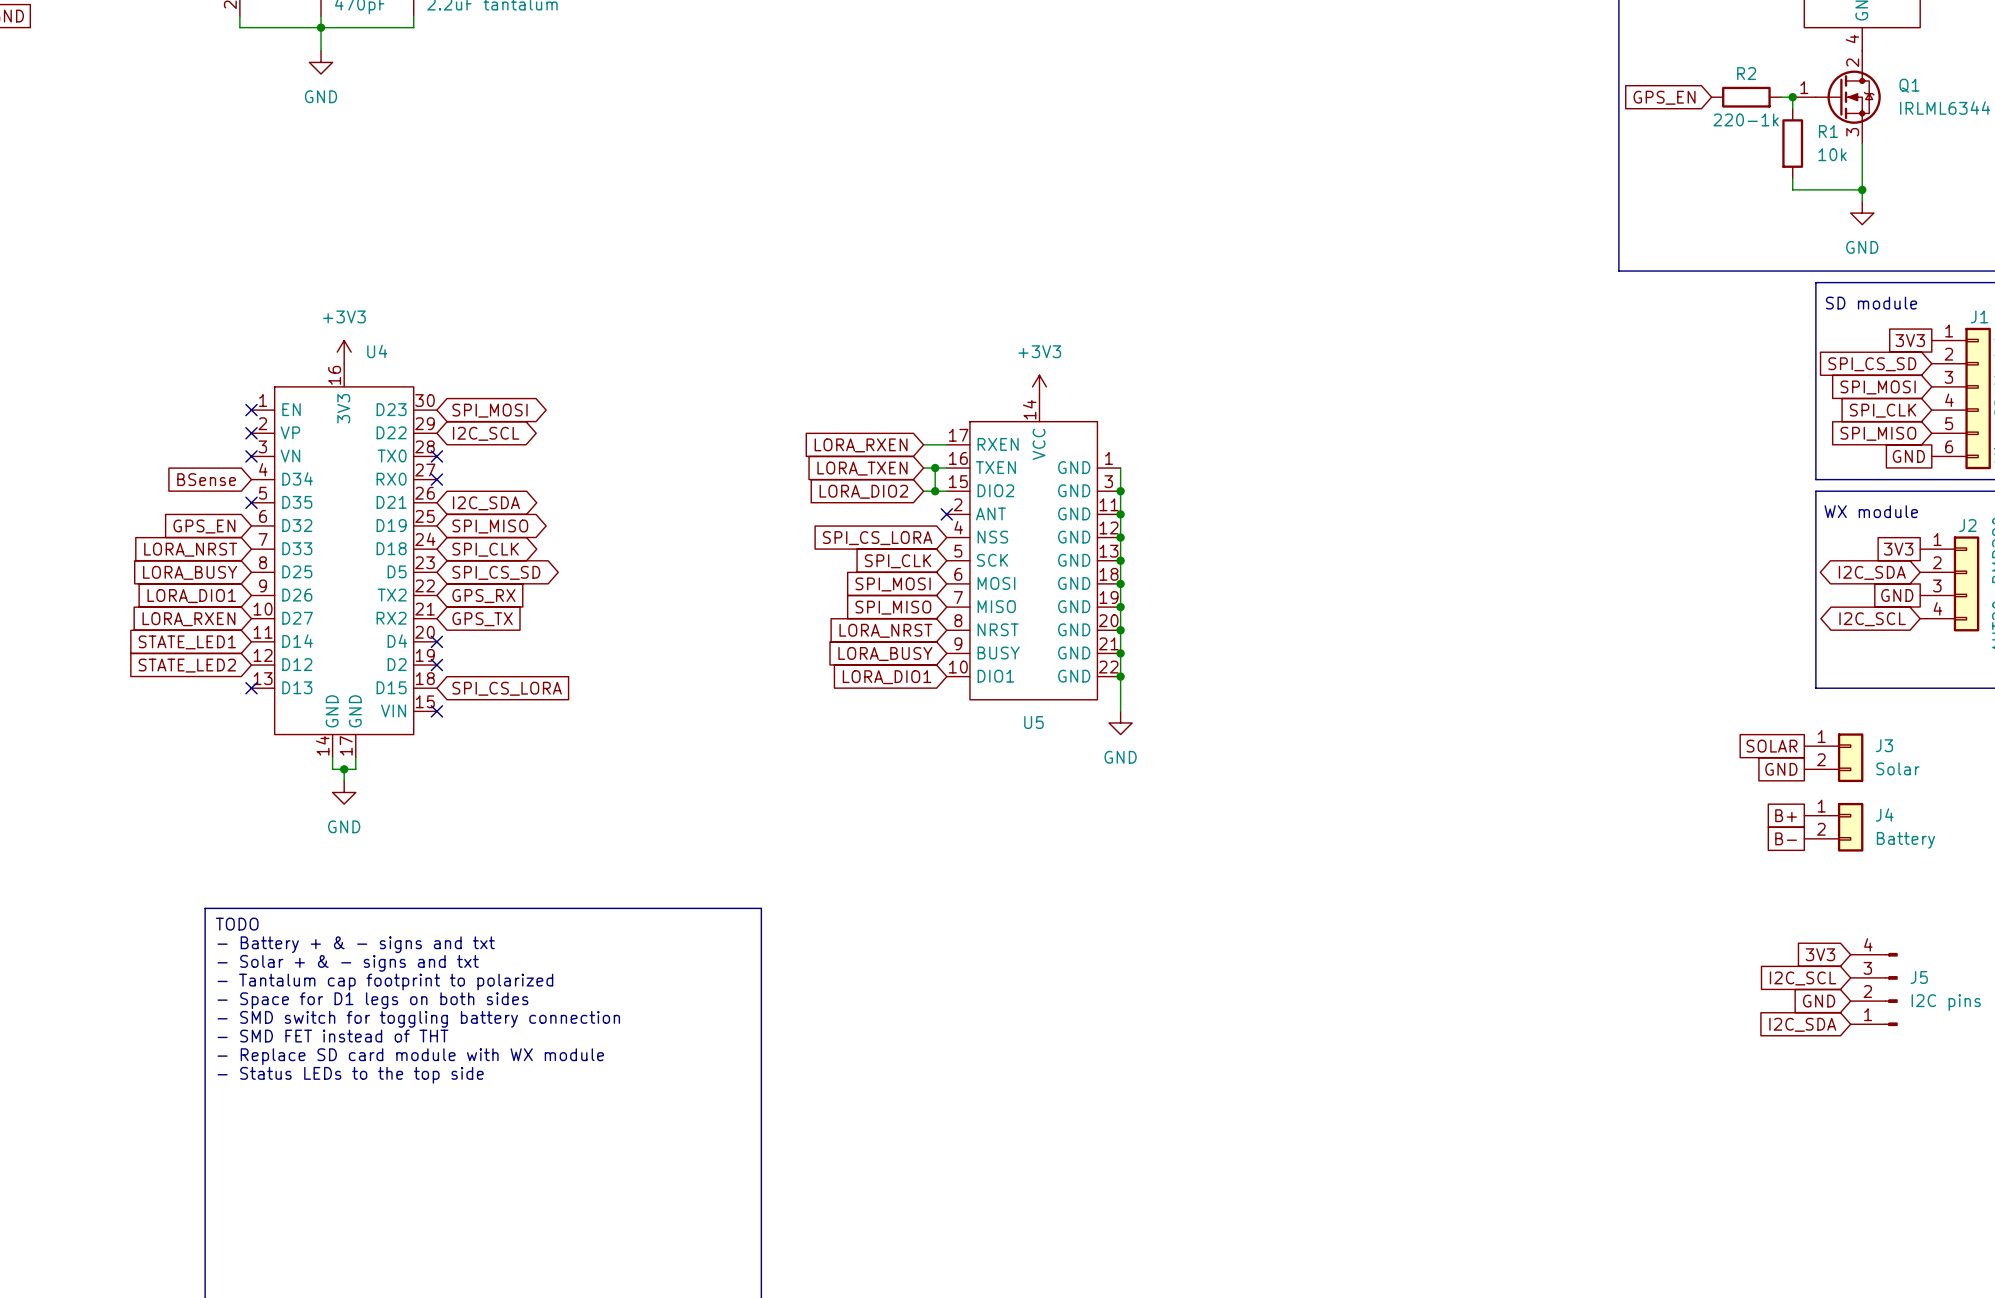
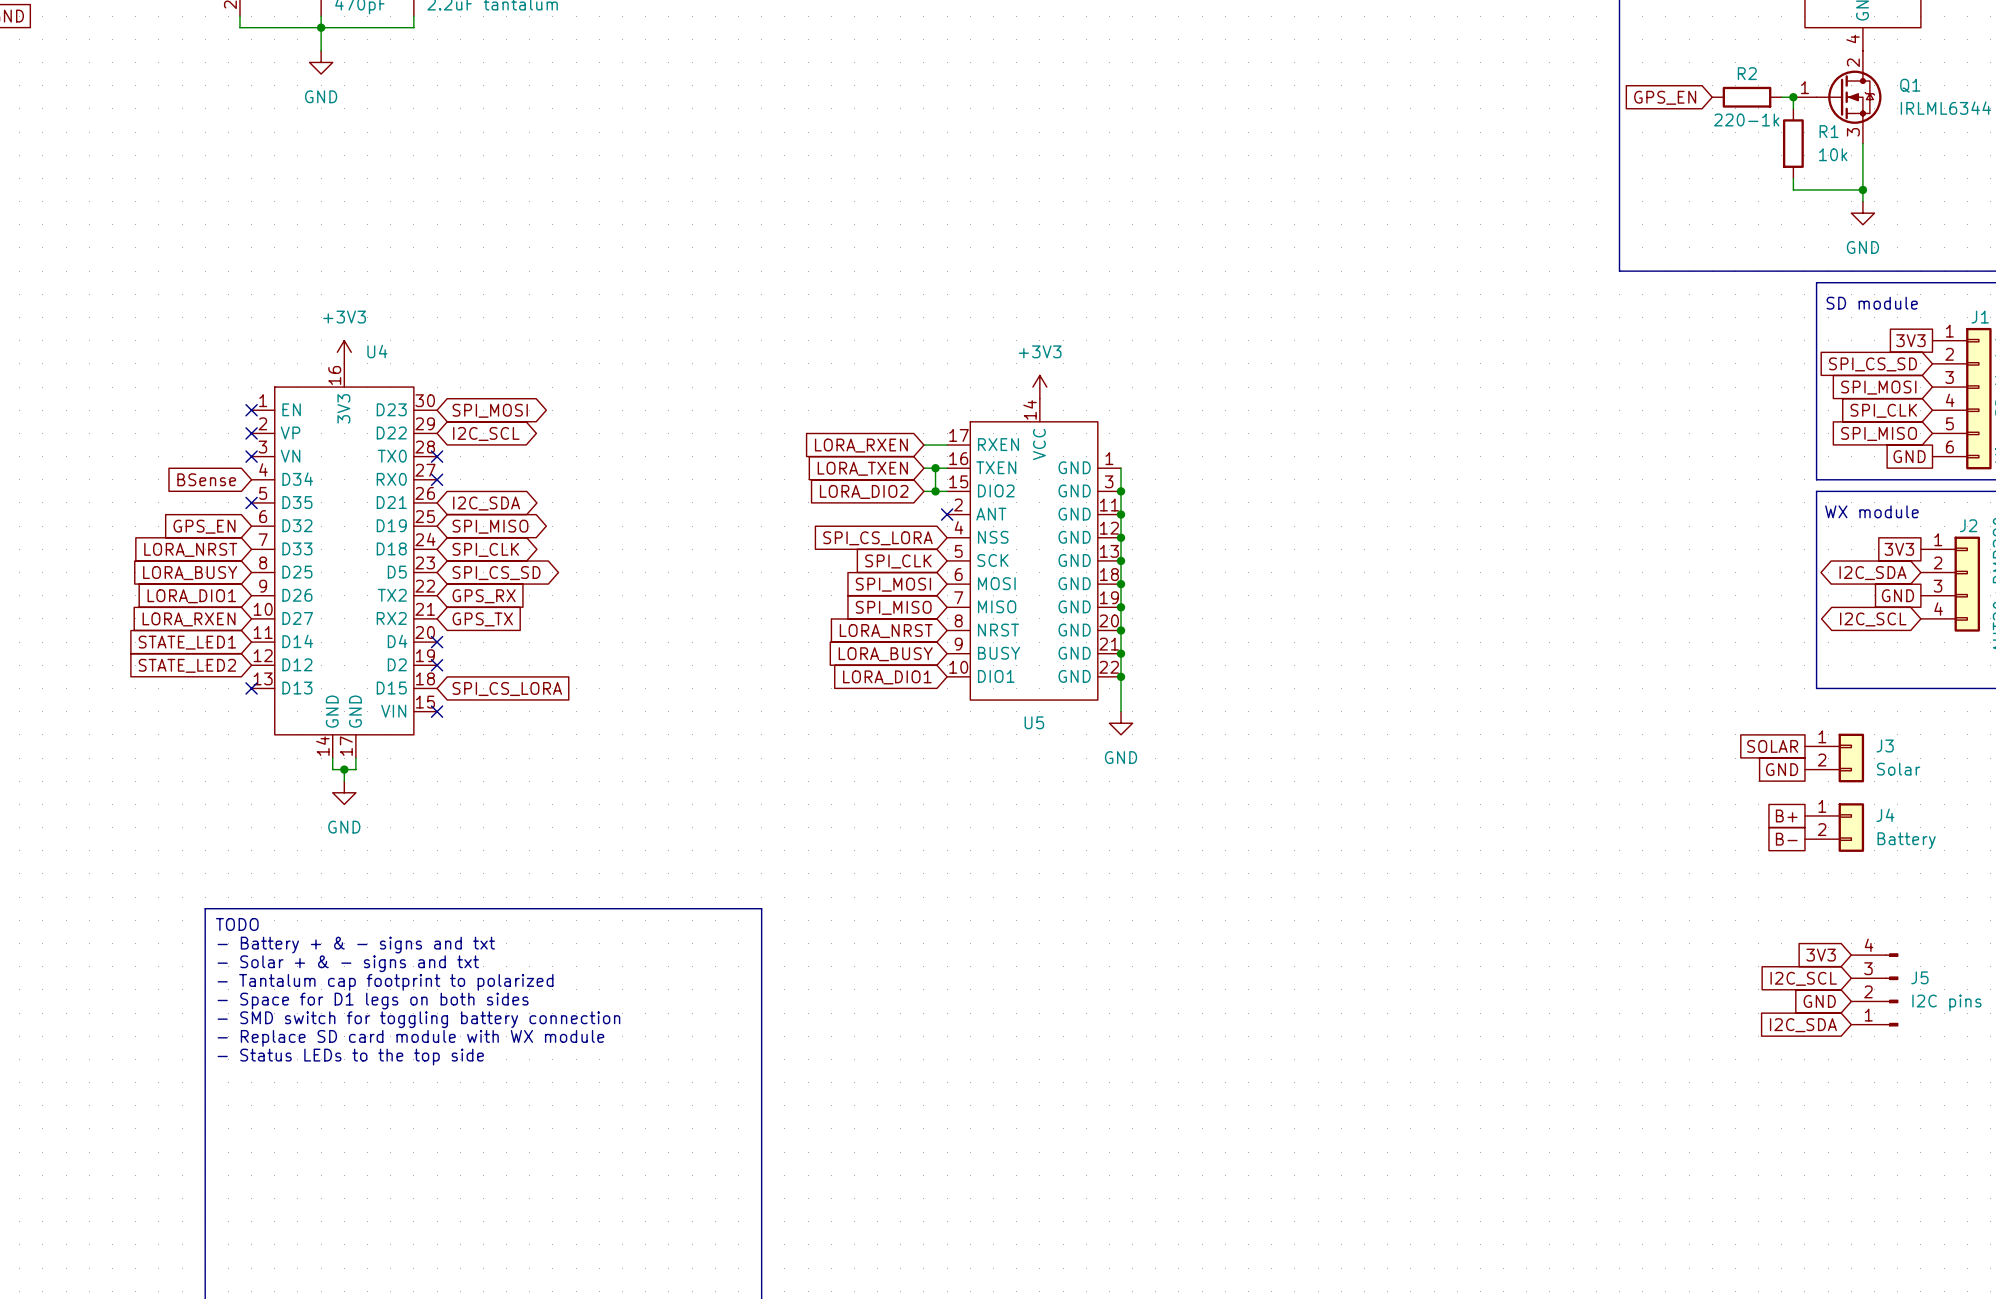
text: - SMD FET instead of THT (332, 1036) -> - Replace SD card module with WX module (410, 1038)
text: - Replace SD card module with WX module (410, 1056) -> - Status LEDs to the top side (350, 1057)
text: - Status LEDs to the top side (350, 1075) -> none

